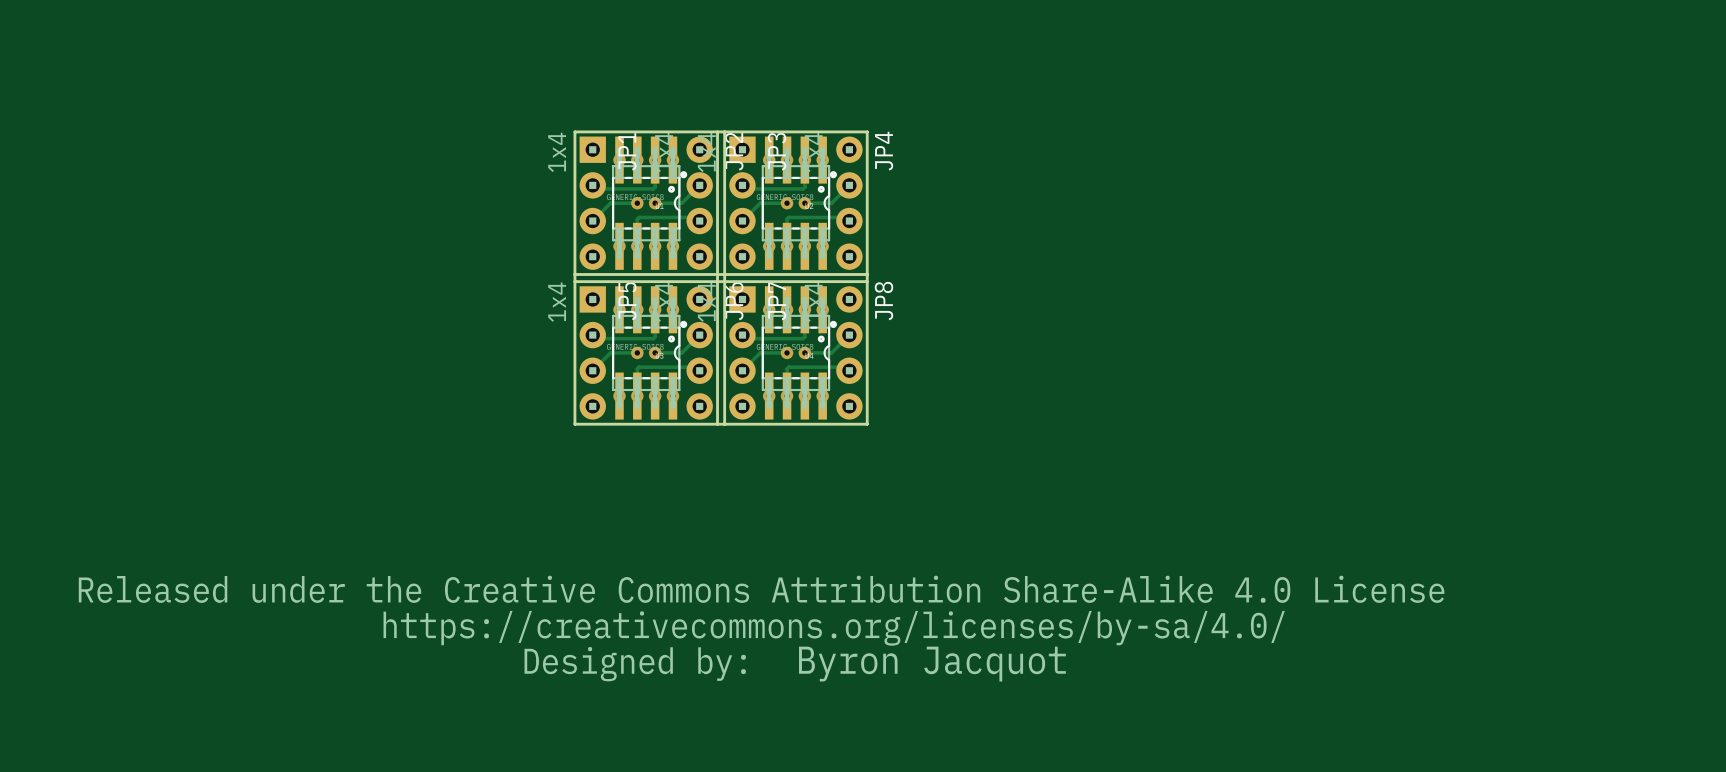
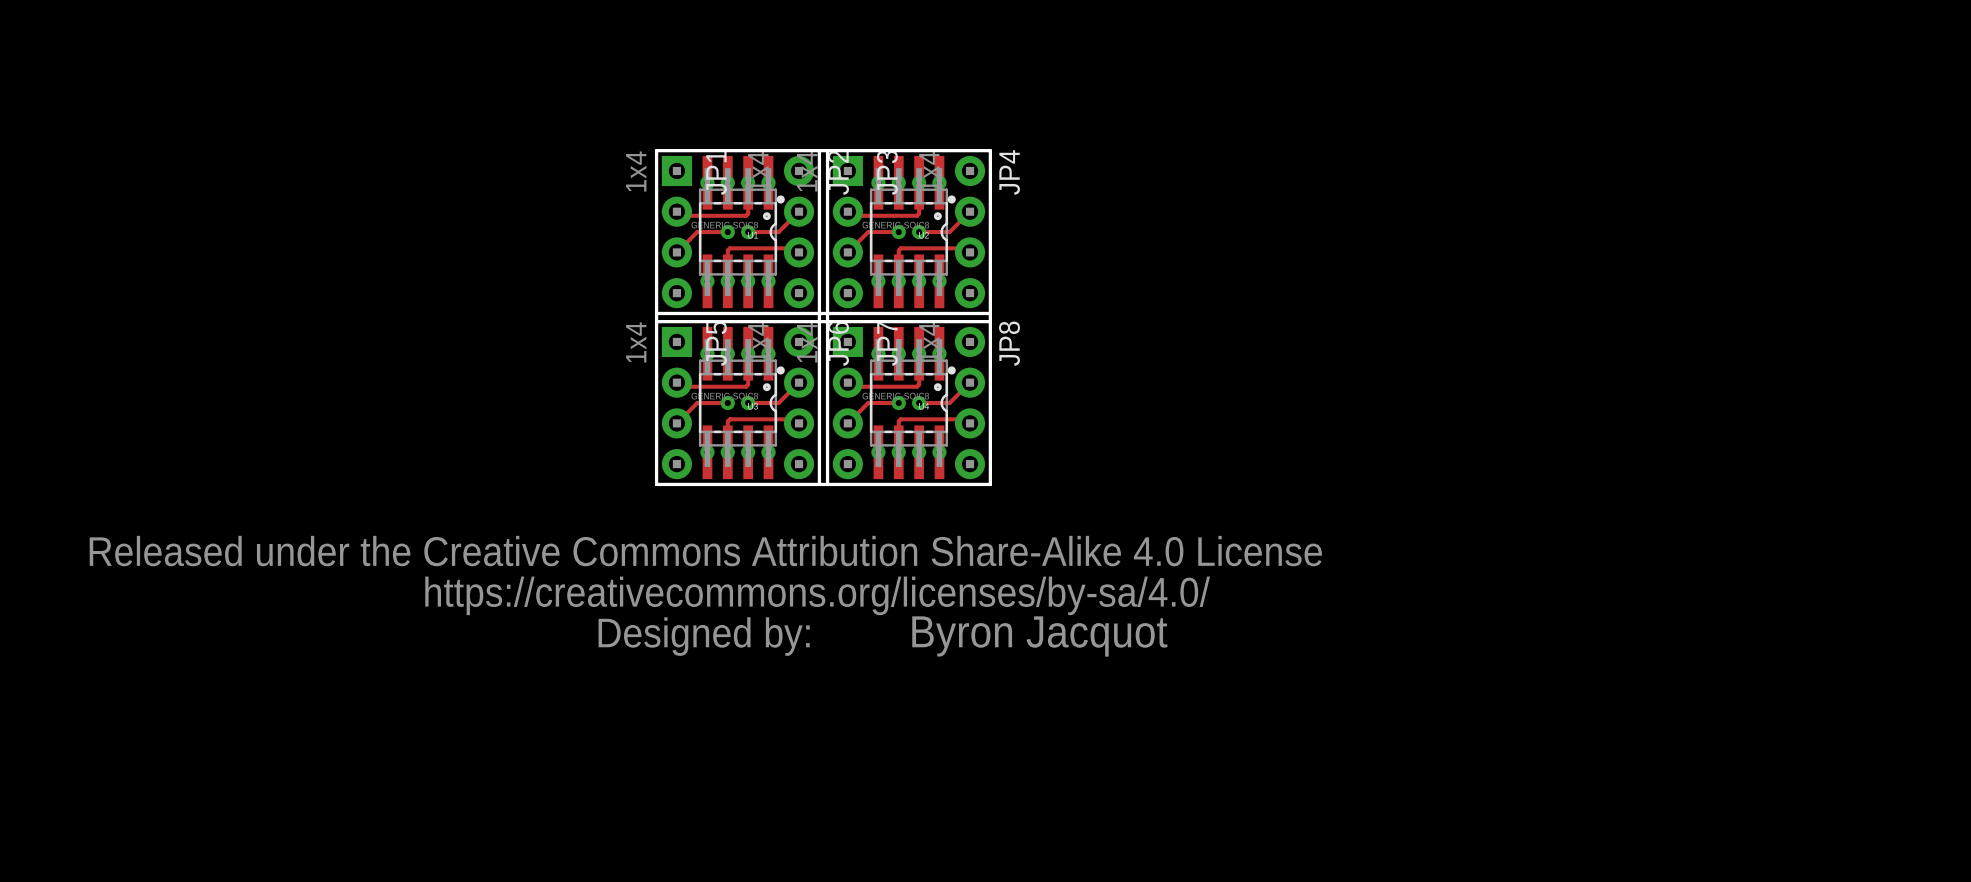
drawing position: (761, 628) -> (705, 595)
text position: Byron Jacquot (932, 664) -> Byron Jacquot (1039, 636)

